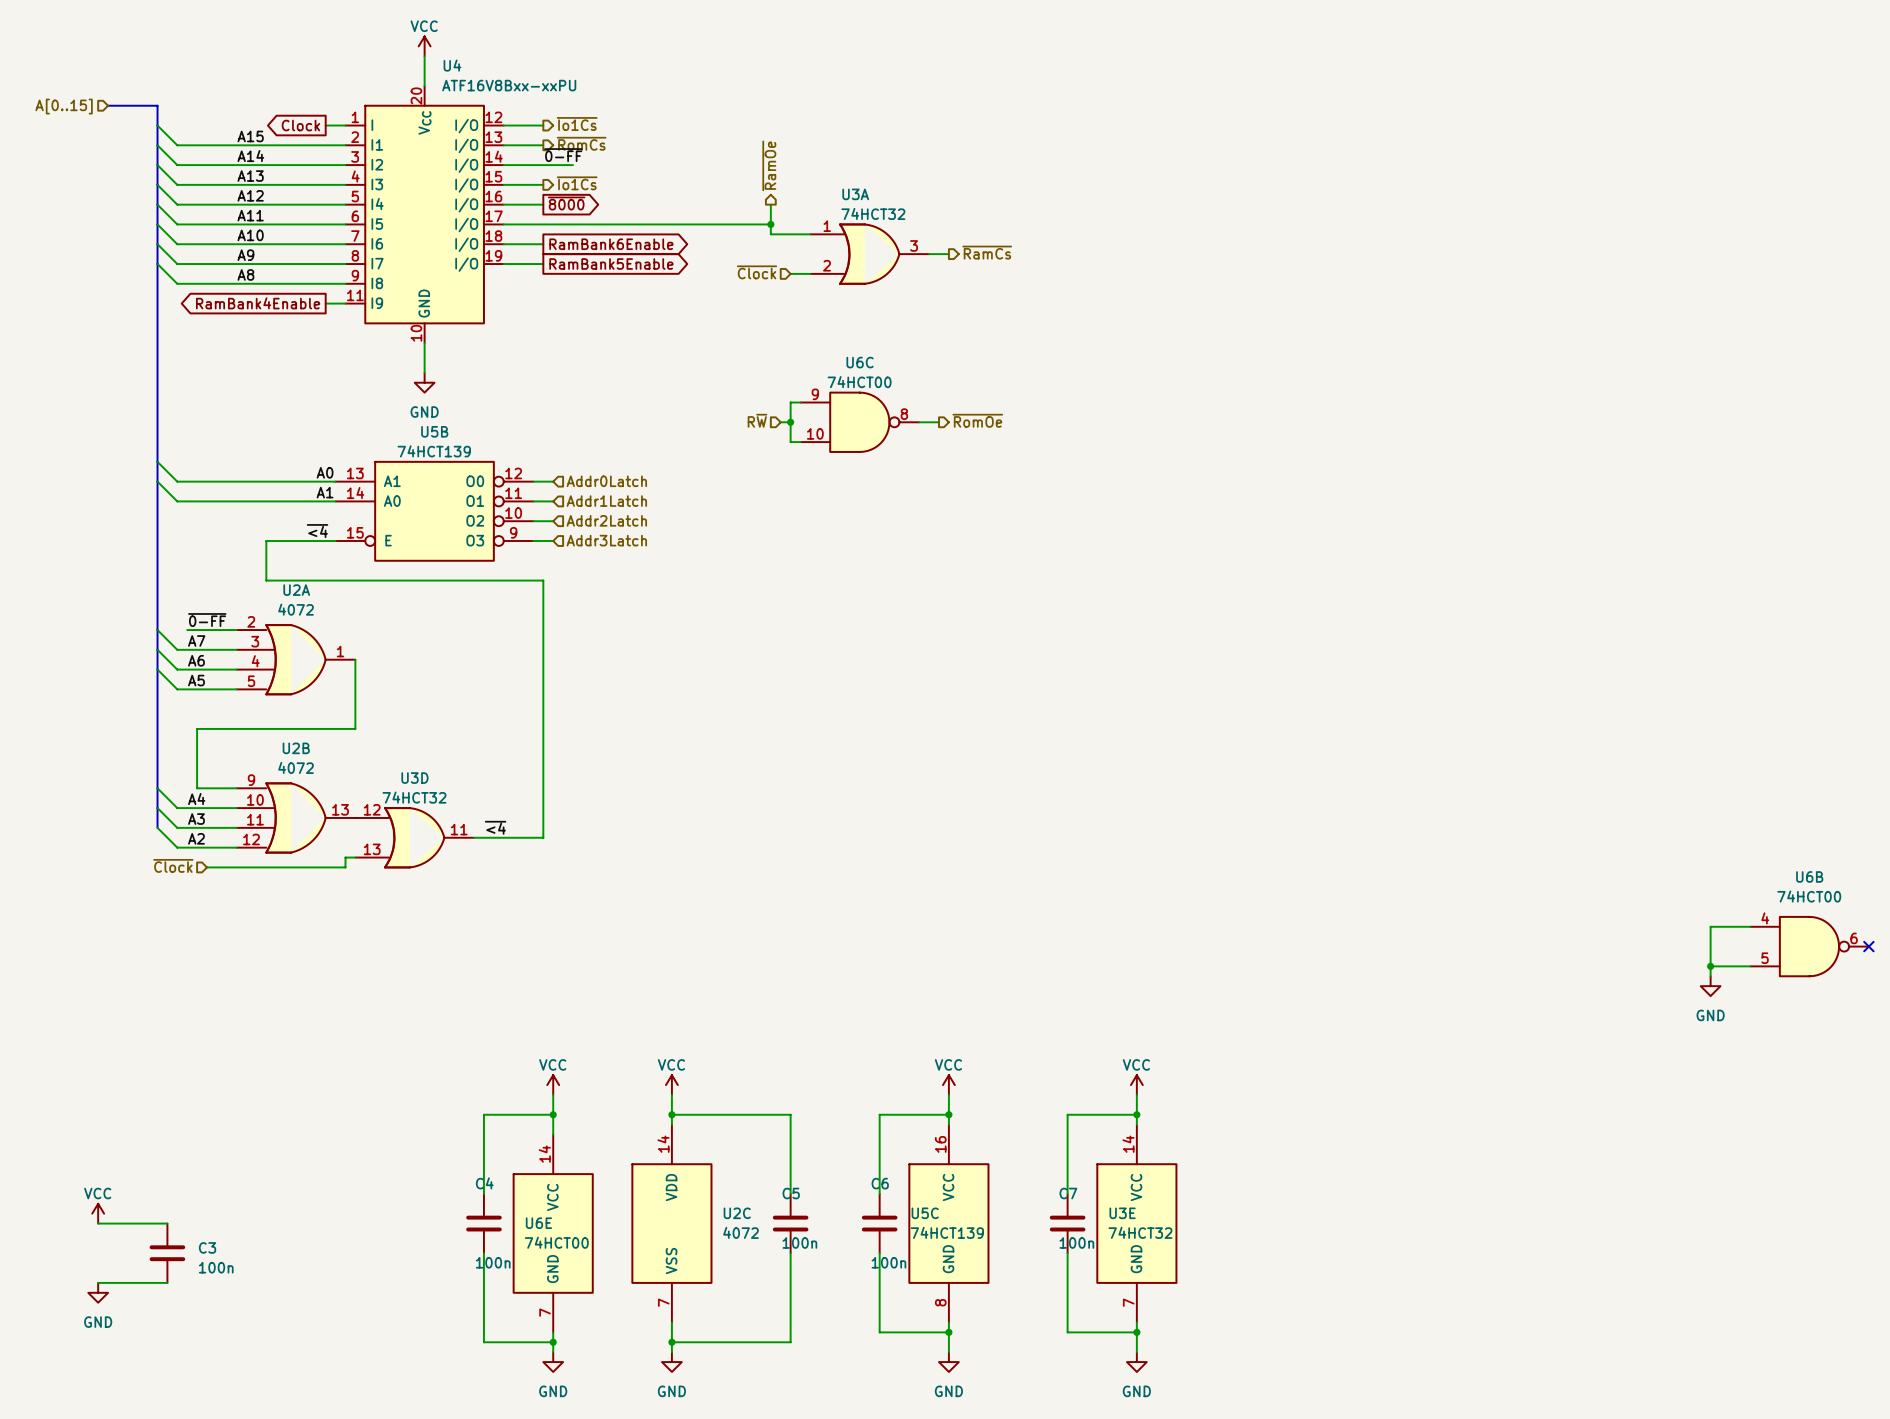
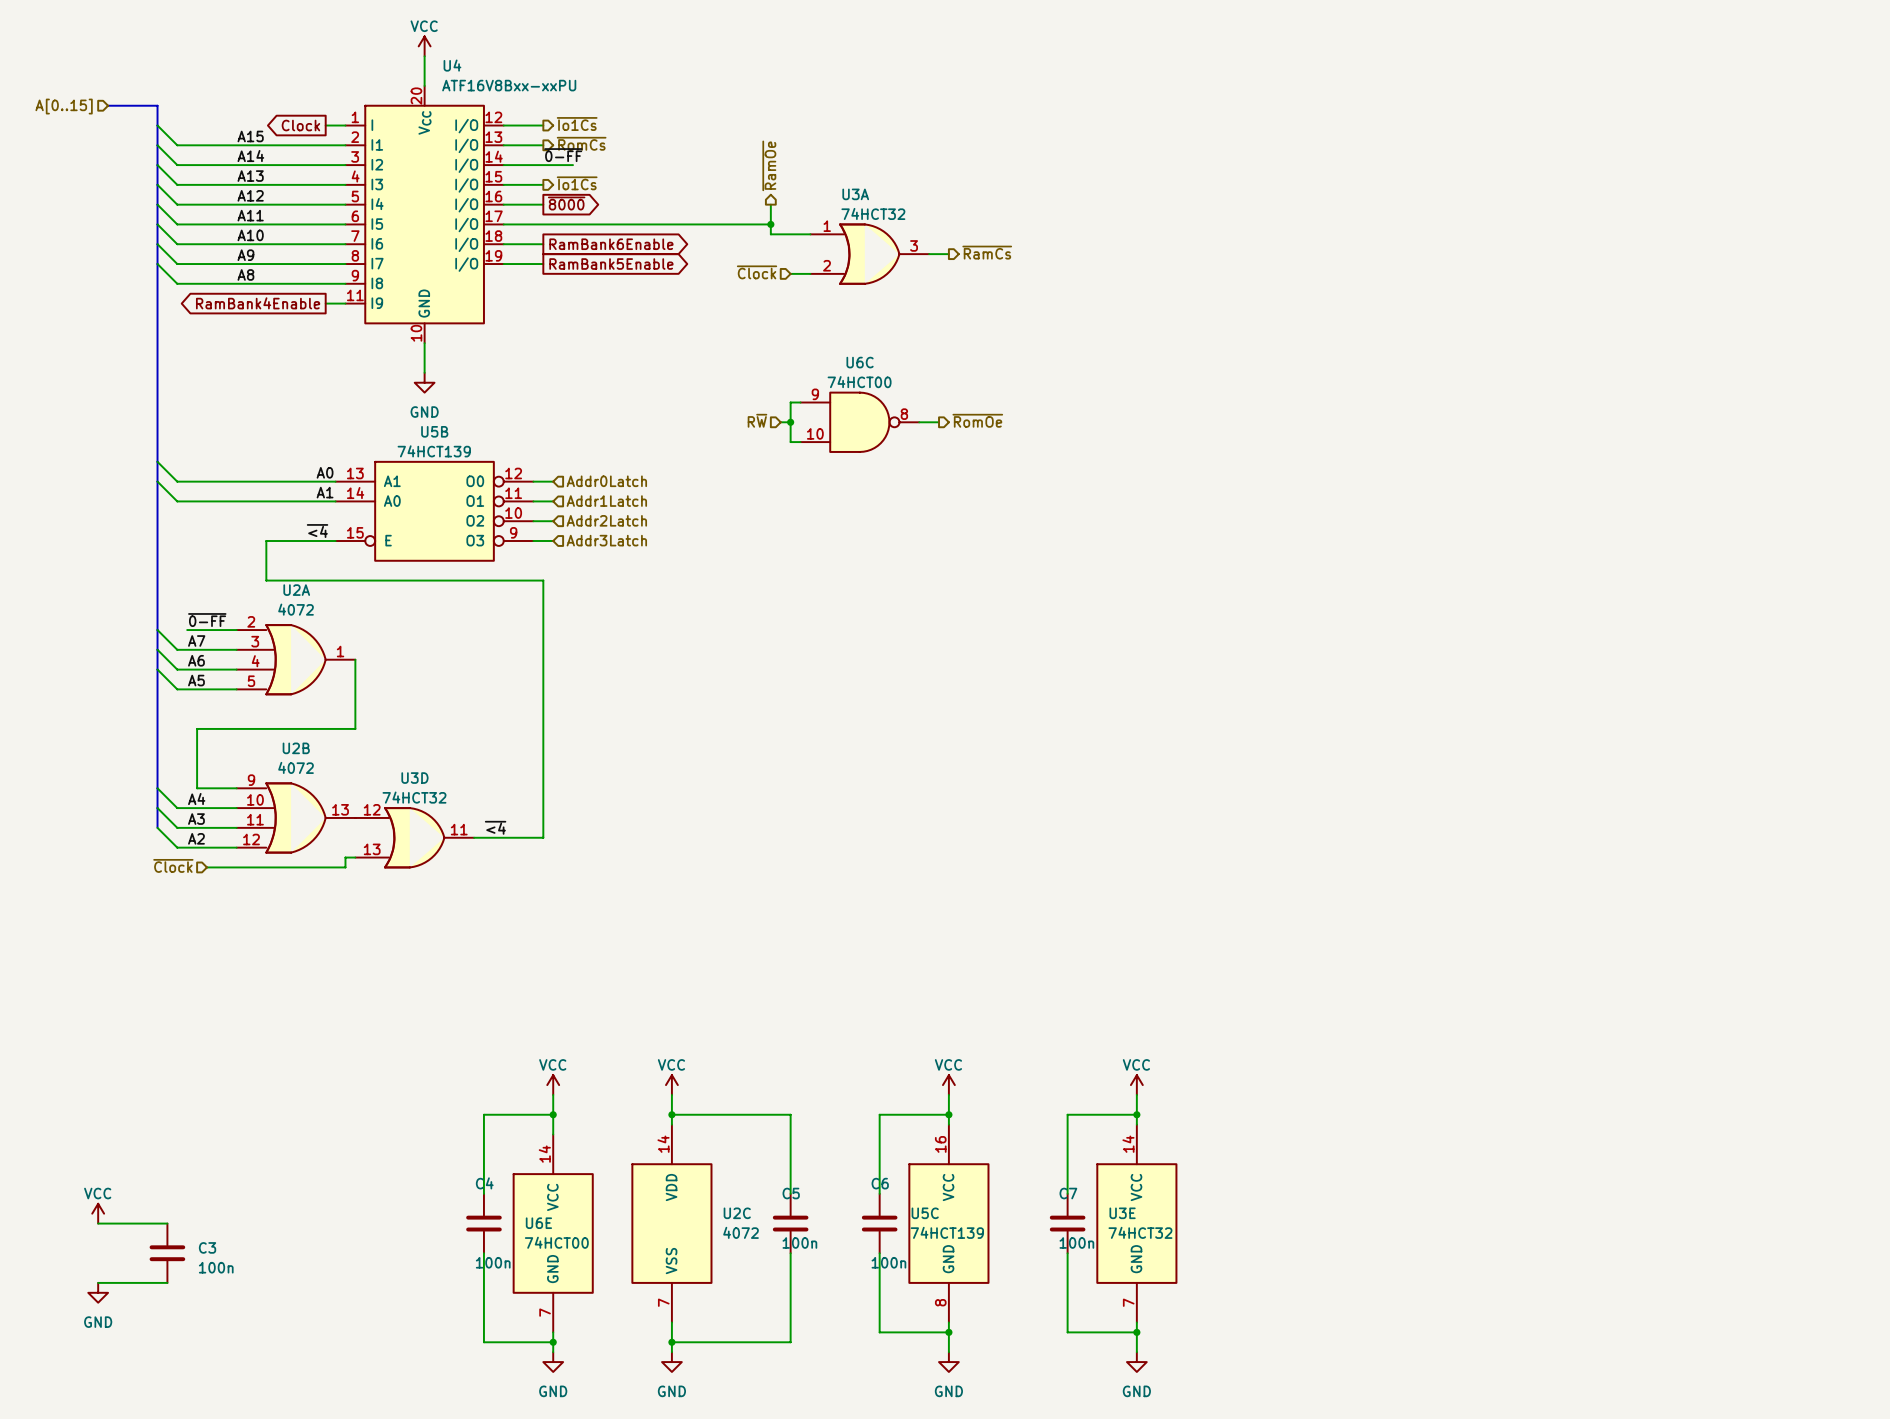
wire: (1750, 926) (1710, 926) (1710, 976) -> none
U6B: 74HCT00 (1809, 946) -> none
no-connect mark: (1868, 946) -> none
wire: (1710, 966) (1750, 966) -> none
junction: (1710, 966) -> none
power symbol: GND (1710, 986) -> none

